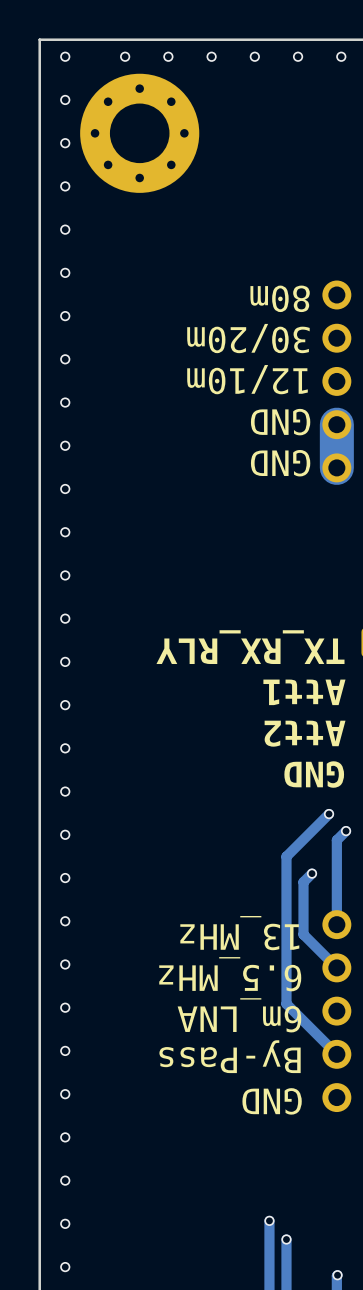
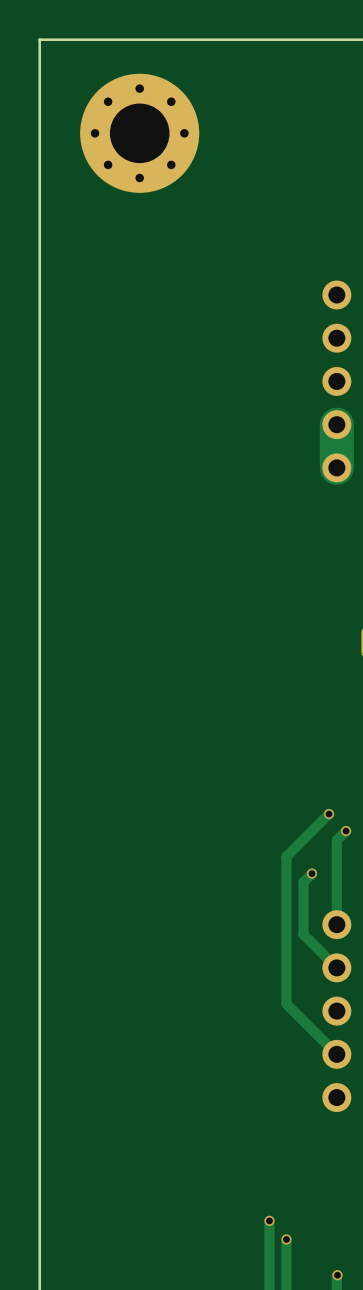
via: (65, 56) -> none
via: (125, 56) -> none
via: (168, 56) -> none
via: (211, 56) -> none
via: (254, 56) -> none
via: (298, 56) -> none
via: (341, 56) -> none
via: (65, 99) -> none
via: (65, 143) -> none
via: (65, 186) -> none
via: (65, 229) -> none
via: (65, 272) -> none
text: 80m (280, 298) -> none
via: (65, 316) -> none
text: 30/20m (248, 338) -> none
via: (65, 359) -> none
text: 12/10m (247, 379) -> none
via: (65, 402) -> none
text: GND (280, 422) -> none
via: (65, 445) -> none
text: GND (280, 463) -> none
via: (65, 489) -> none
via: (65, 532) -> none
via: (65, 575) -> none
via: (65, 618) -> none
text: TX_RX_RLY (250, 647) -> none
via: (65, 661) -> none
text: Att1 (304, 692) -> none
via: (65, 705) -> none
text: Att2 (305, 733) -> none
via: (65, 748) -> none
text: GND (314, 774) -> none
via: (65, 791) -> none
via: (65, 834) -> none
via: (65, 878) -> none
via: (65, 921) -> none
text: 13_MHz (239, 933) -> none
via: (65, 964) -> none
text: 6.5_MHz (230, 974) -> none
via: (65, 1007) -> none
text: 6m_LNA (239, 1015) -> none
via: (65, 1050) -> none
text: By-Pass (230, 1056) -> none
via: (65, 1094) -> none
text: GND (272, 1101) -> none
via: (65, 1137) -> none
via: (65, 1180) -> none
via: (65, 1223) -> none
via: (65, 1267) -> none

